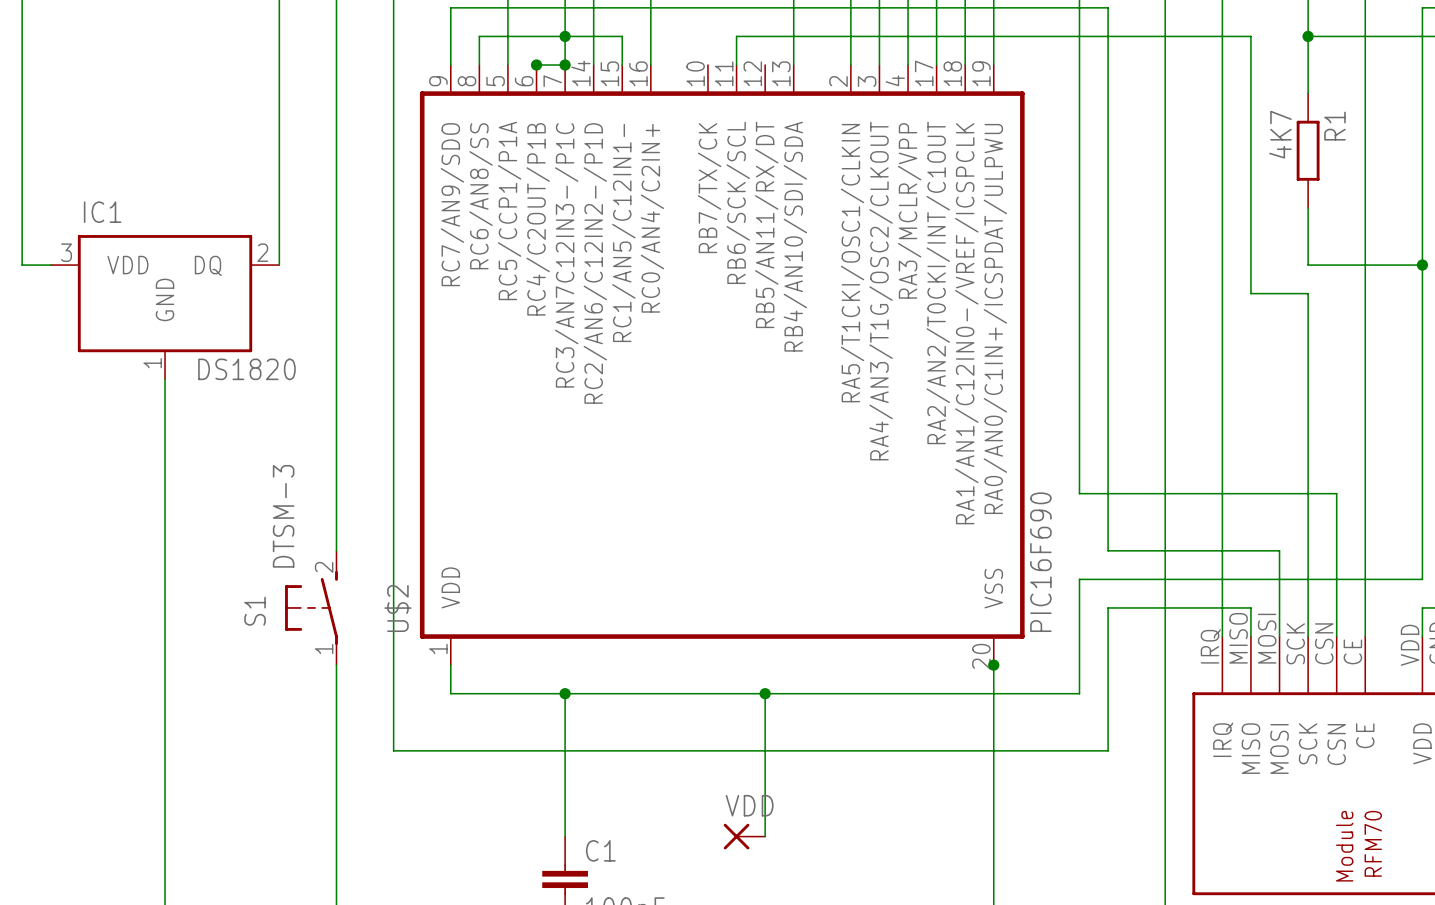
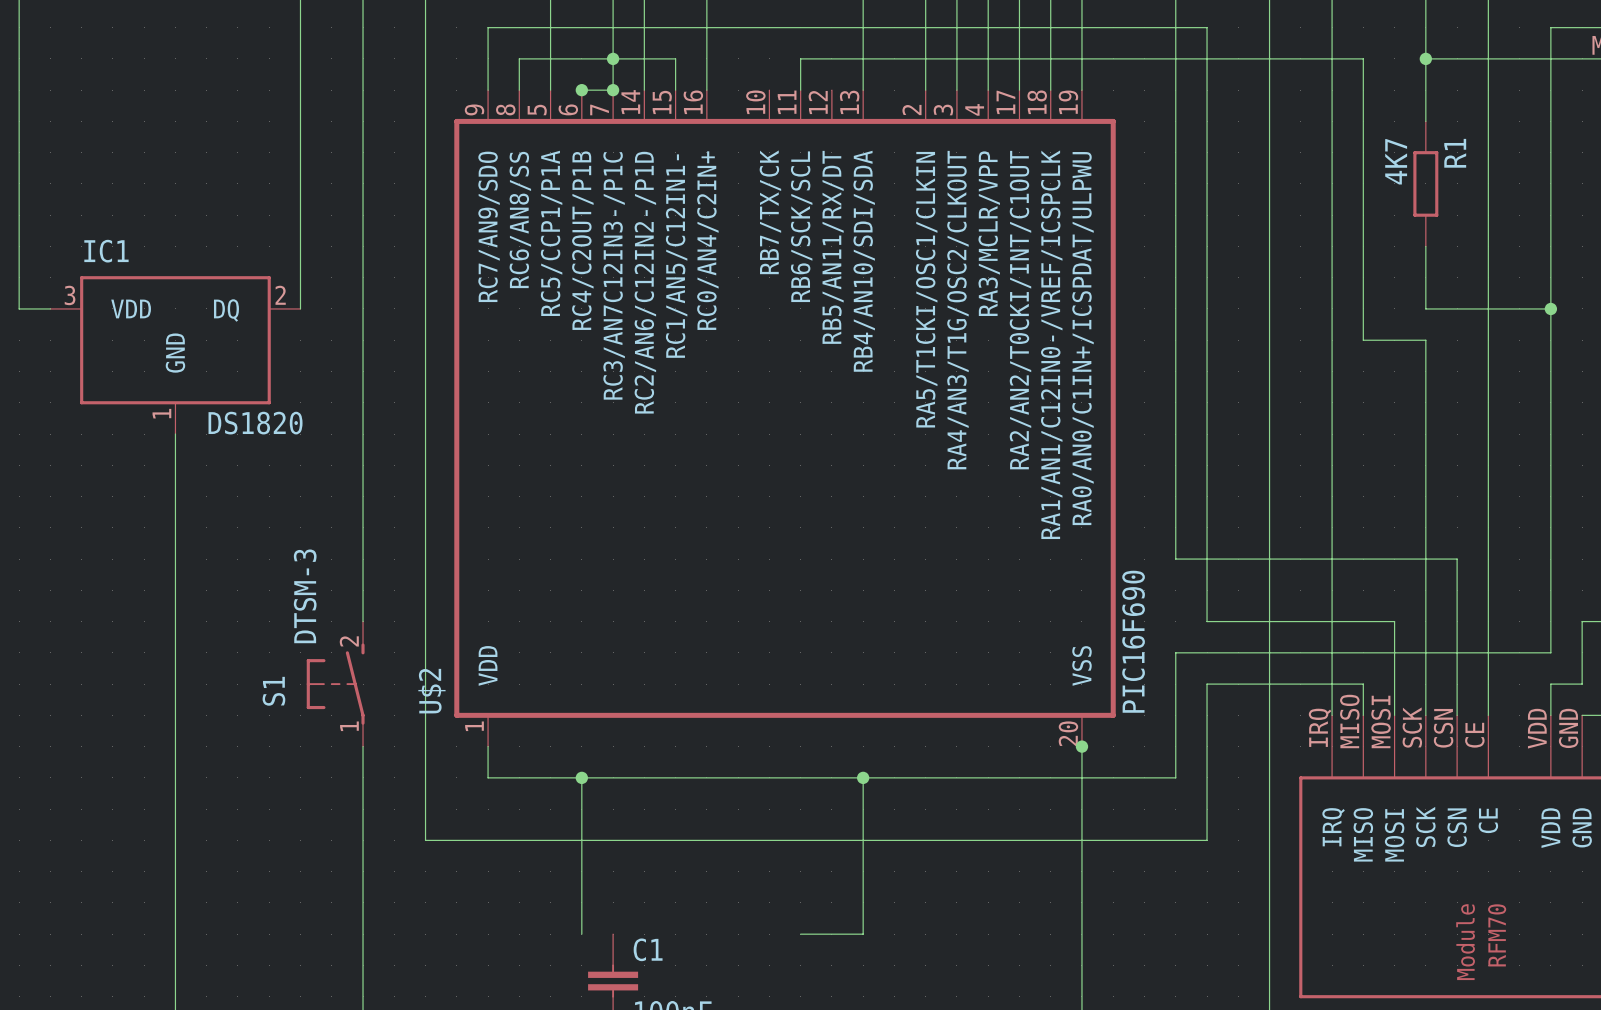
wire: (565, 693) (565, 836) -> (581, 777) (581, 934)
junction position: (565, 693) -> (581, 777)
wire: (765, 693) (765, 836) -> none
junction position: (765, 693) -> (863, 777)
wire: none -> (863, 777) (863, 934) (800, 934)
VDD: (744, 836) -> none

